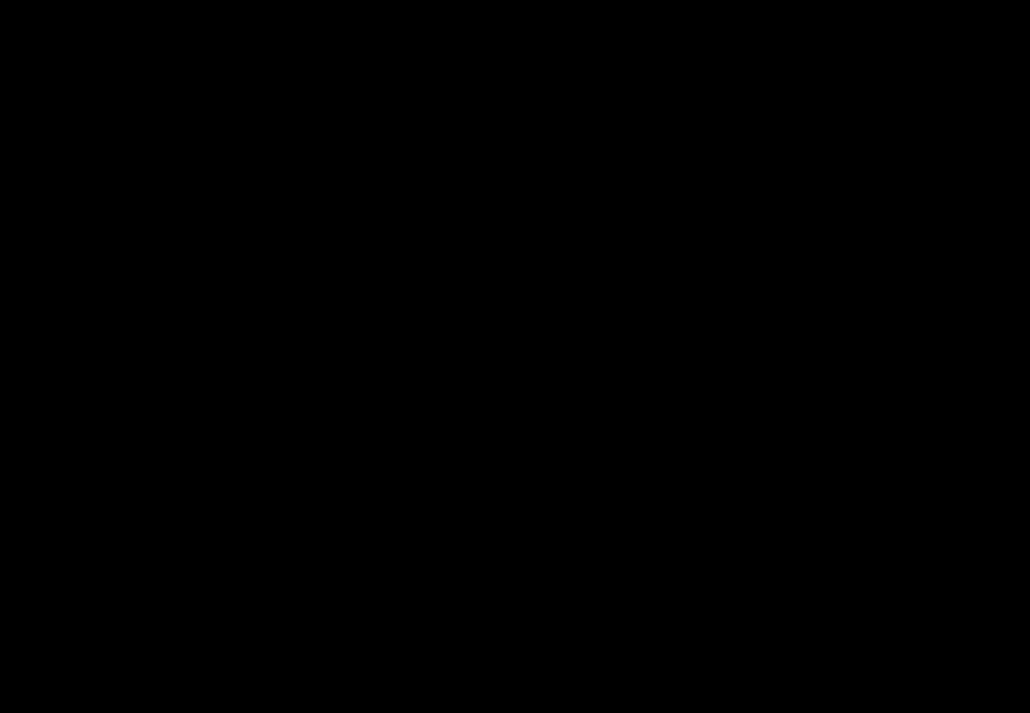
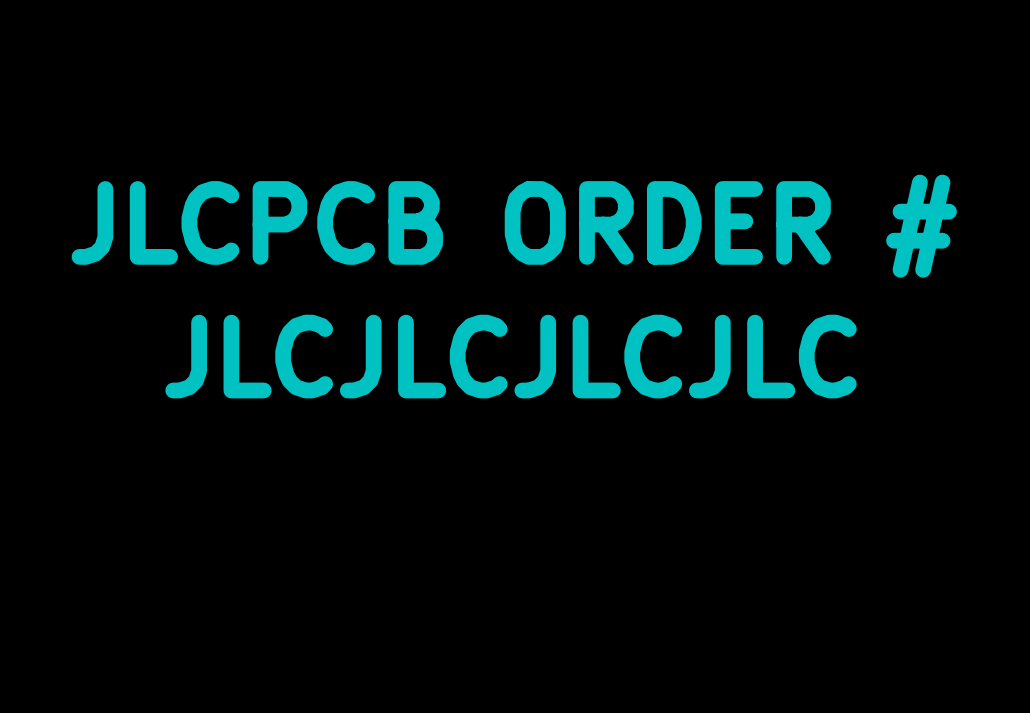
text: none -> JLCPCB ORDER # (514, 226)
text: none -> JLCJLCJLCJLC (511, 356)

